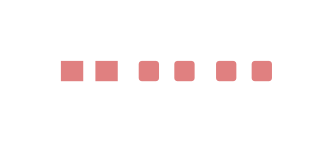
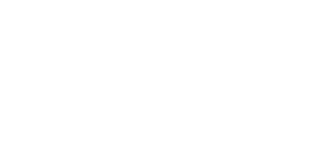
part: (89, 71) -> none
part: (166, 71) -> none
part: (244, 71) -> none

